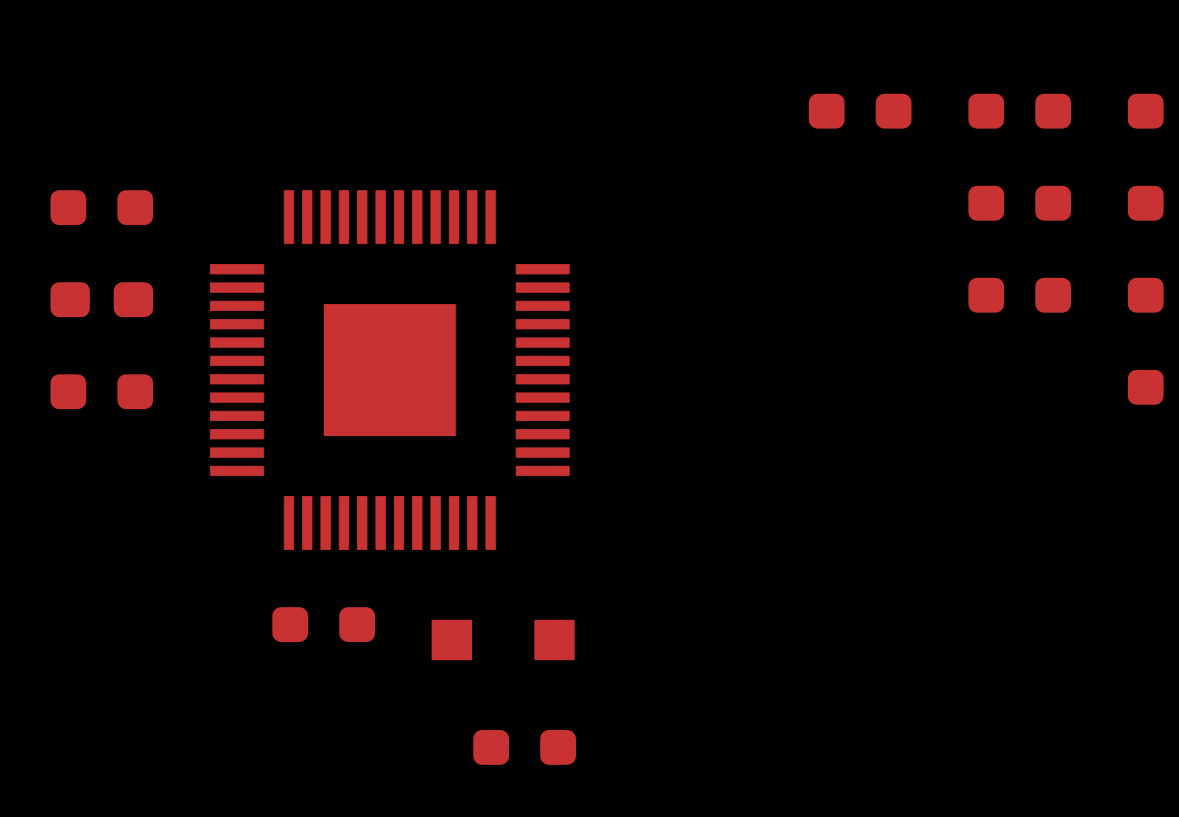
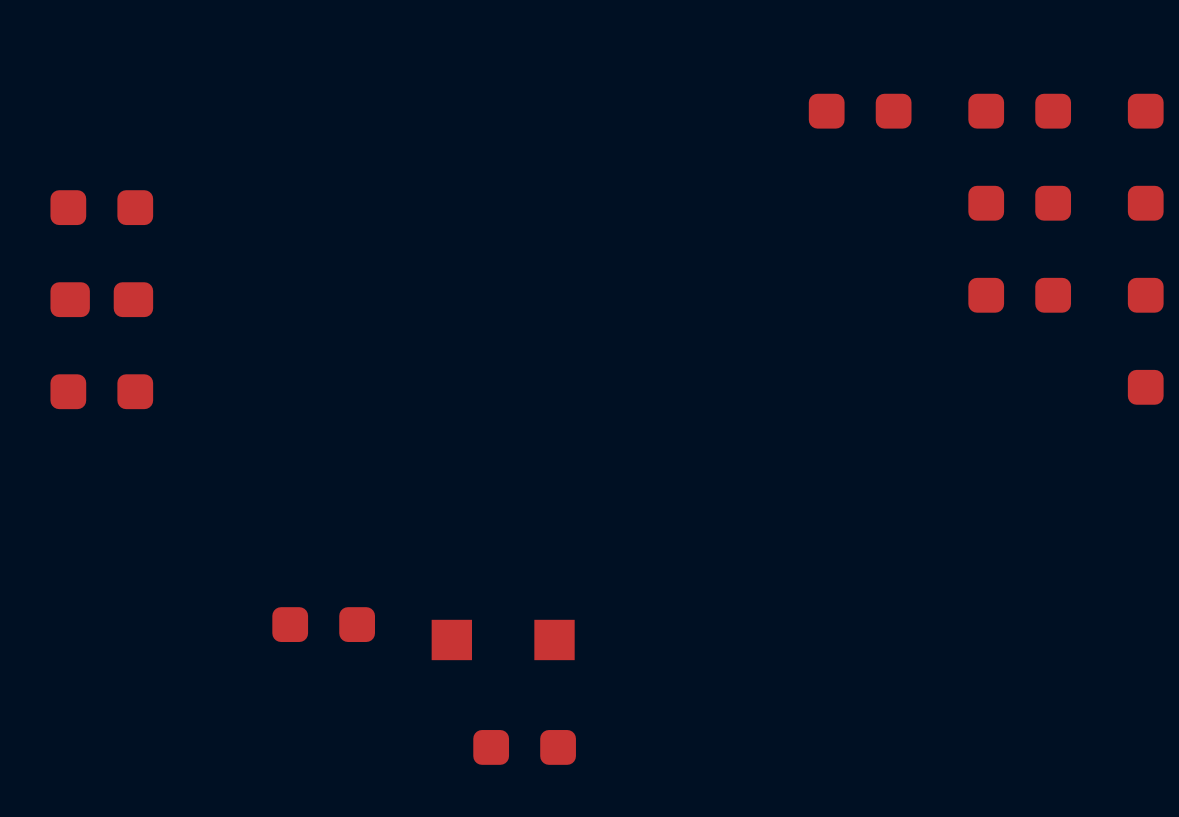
part: (389, 370) -> none

